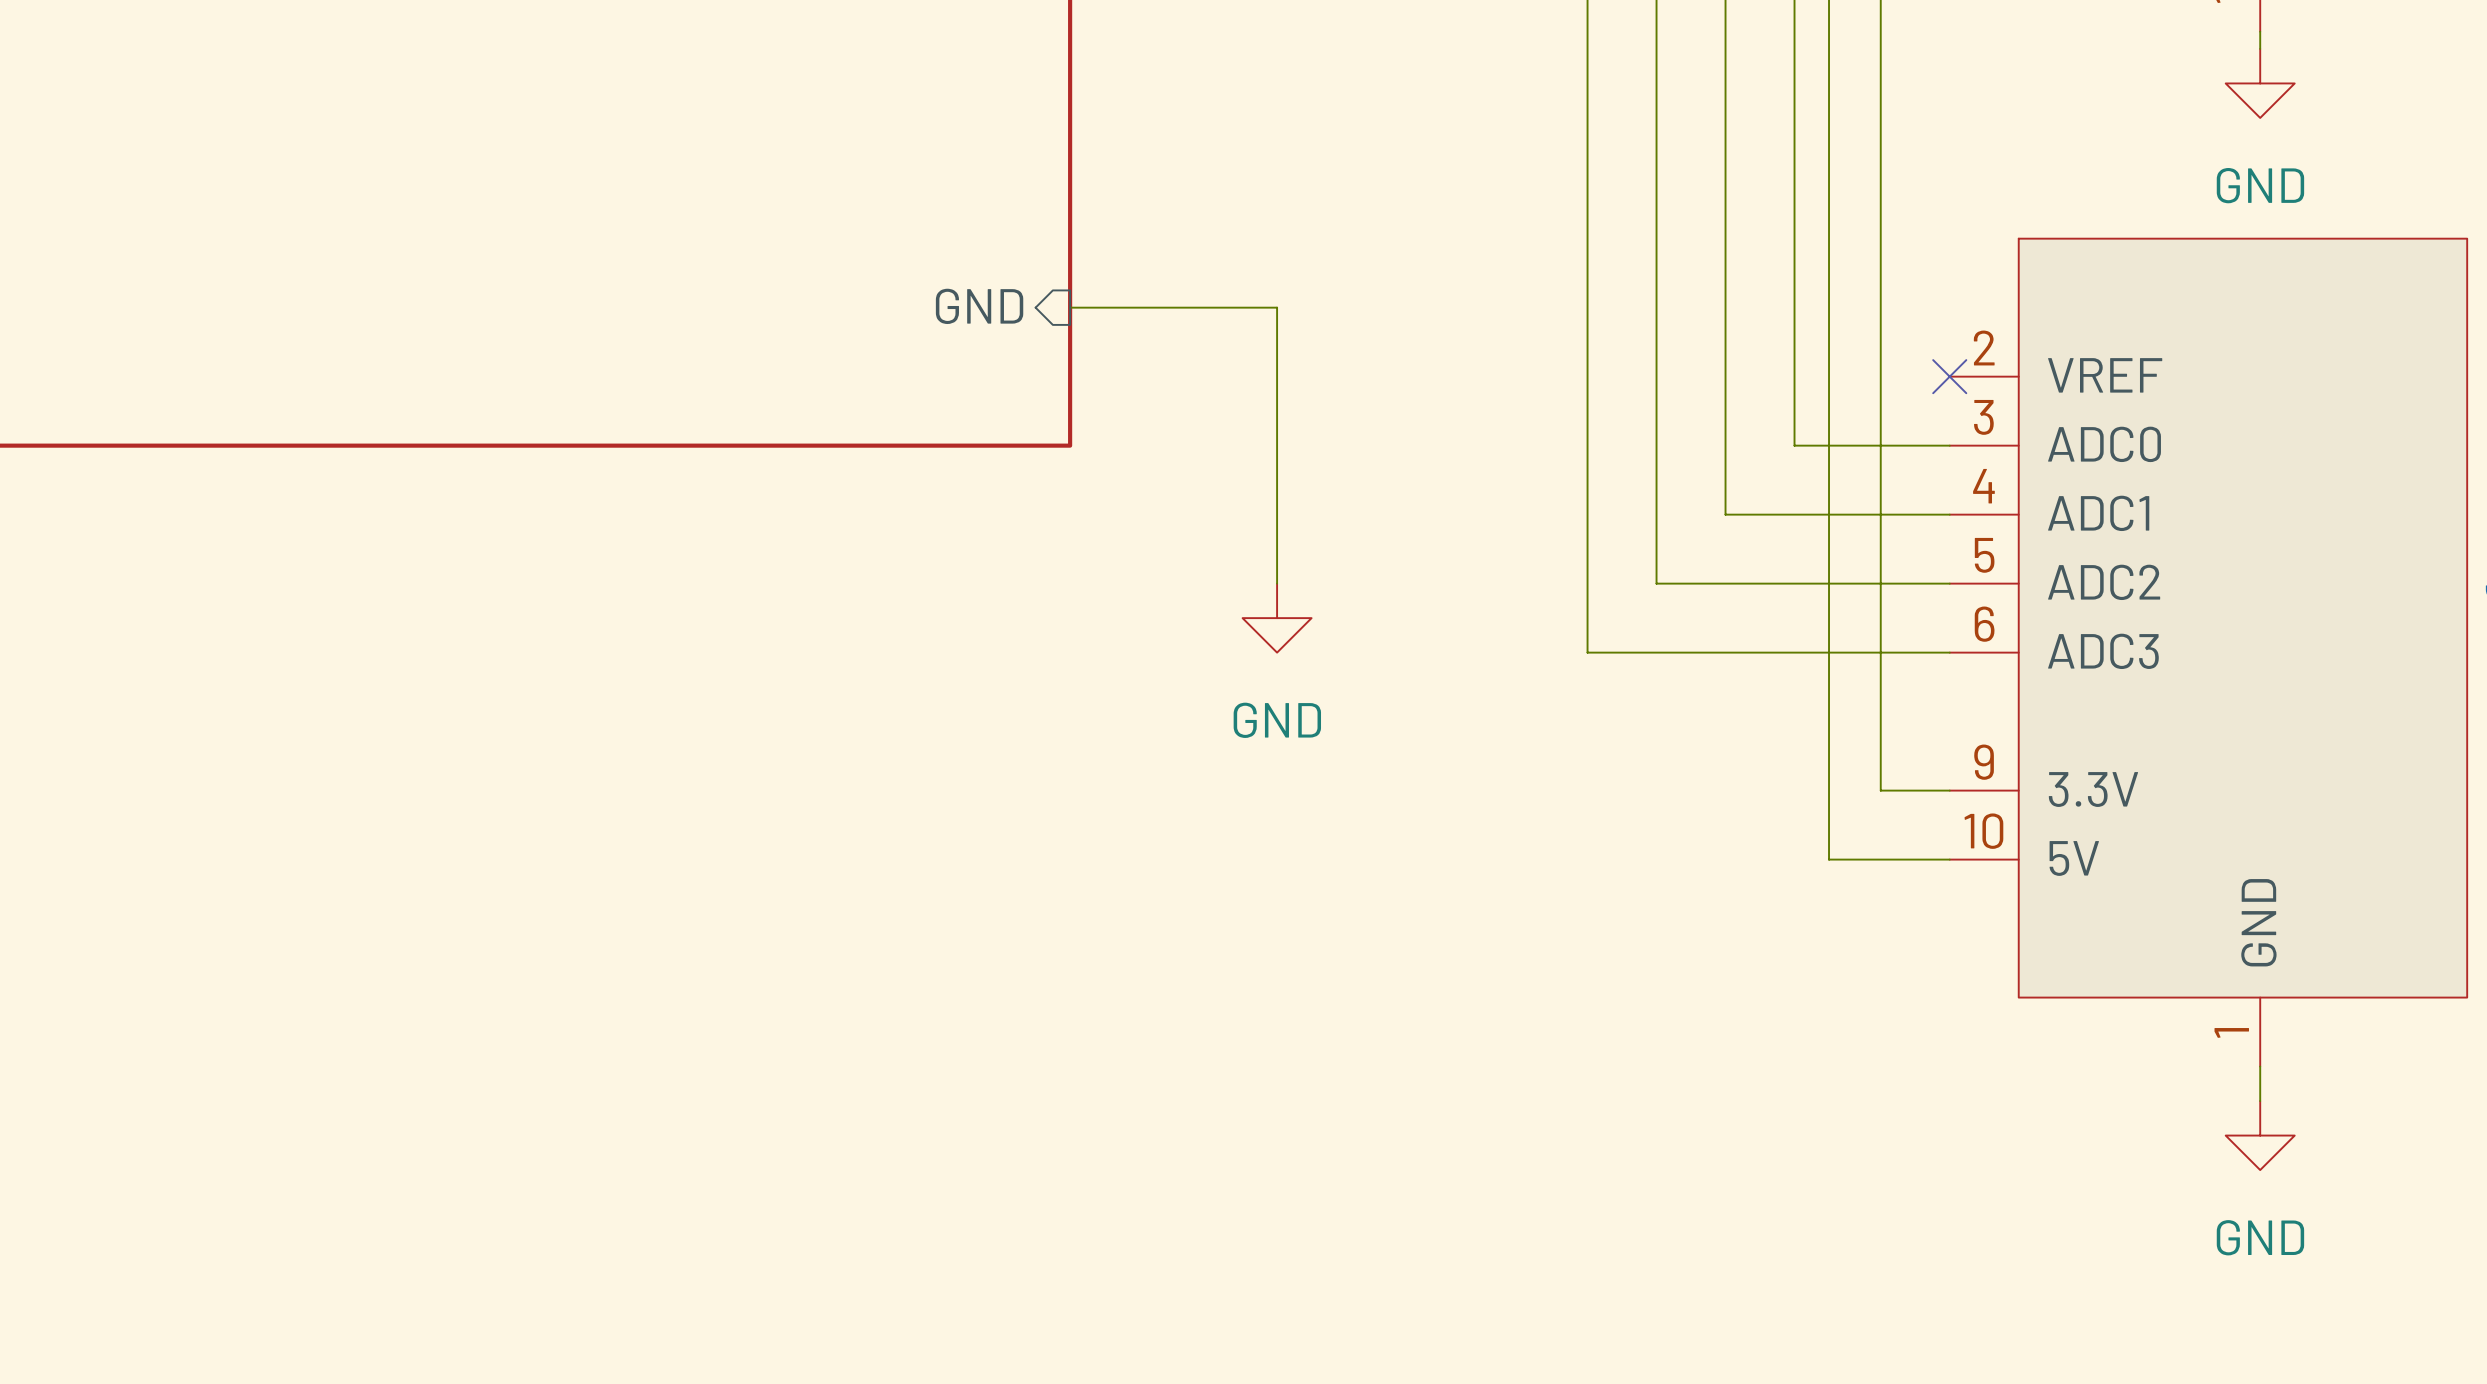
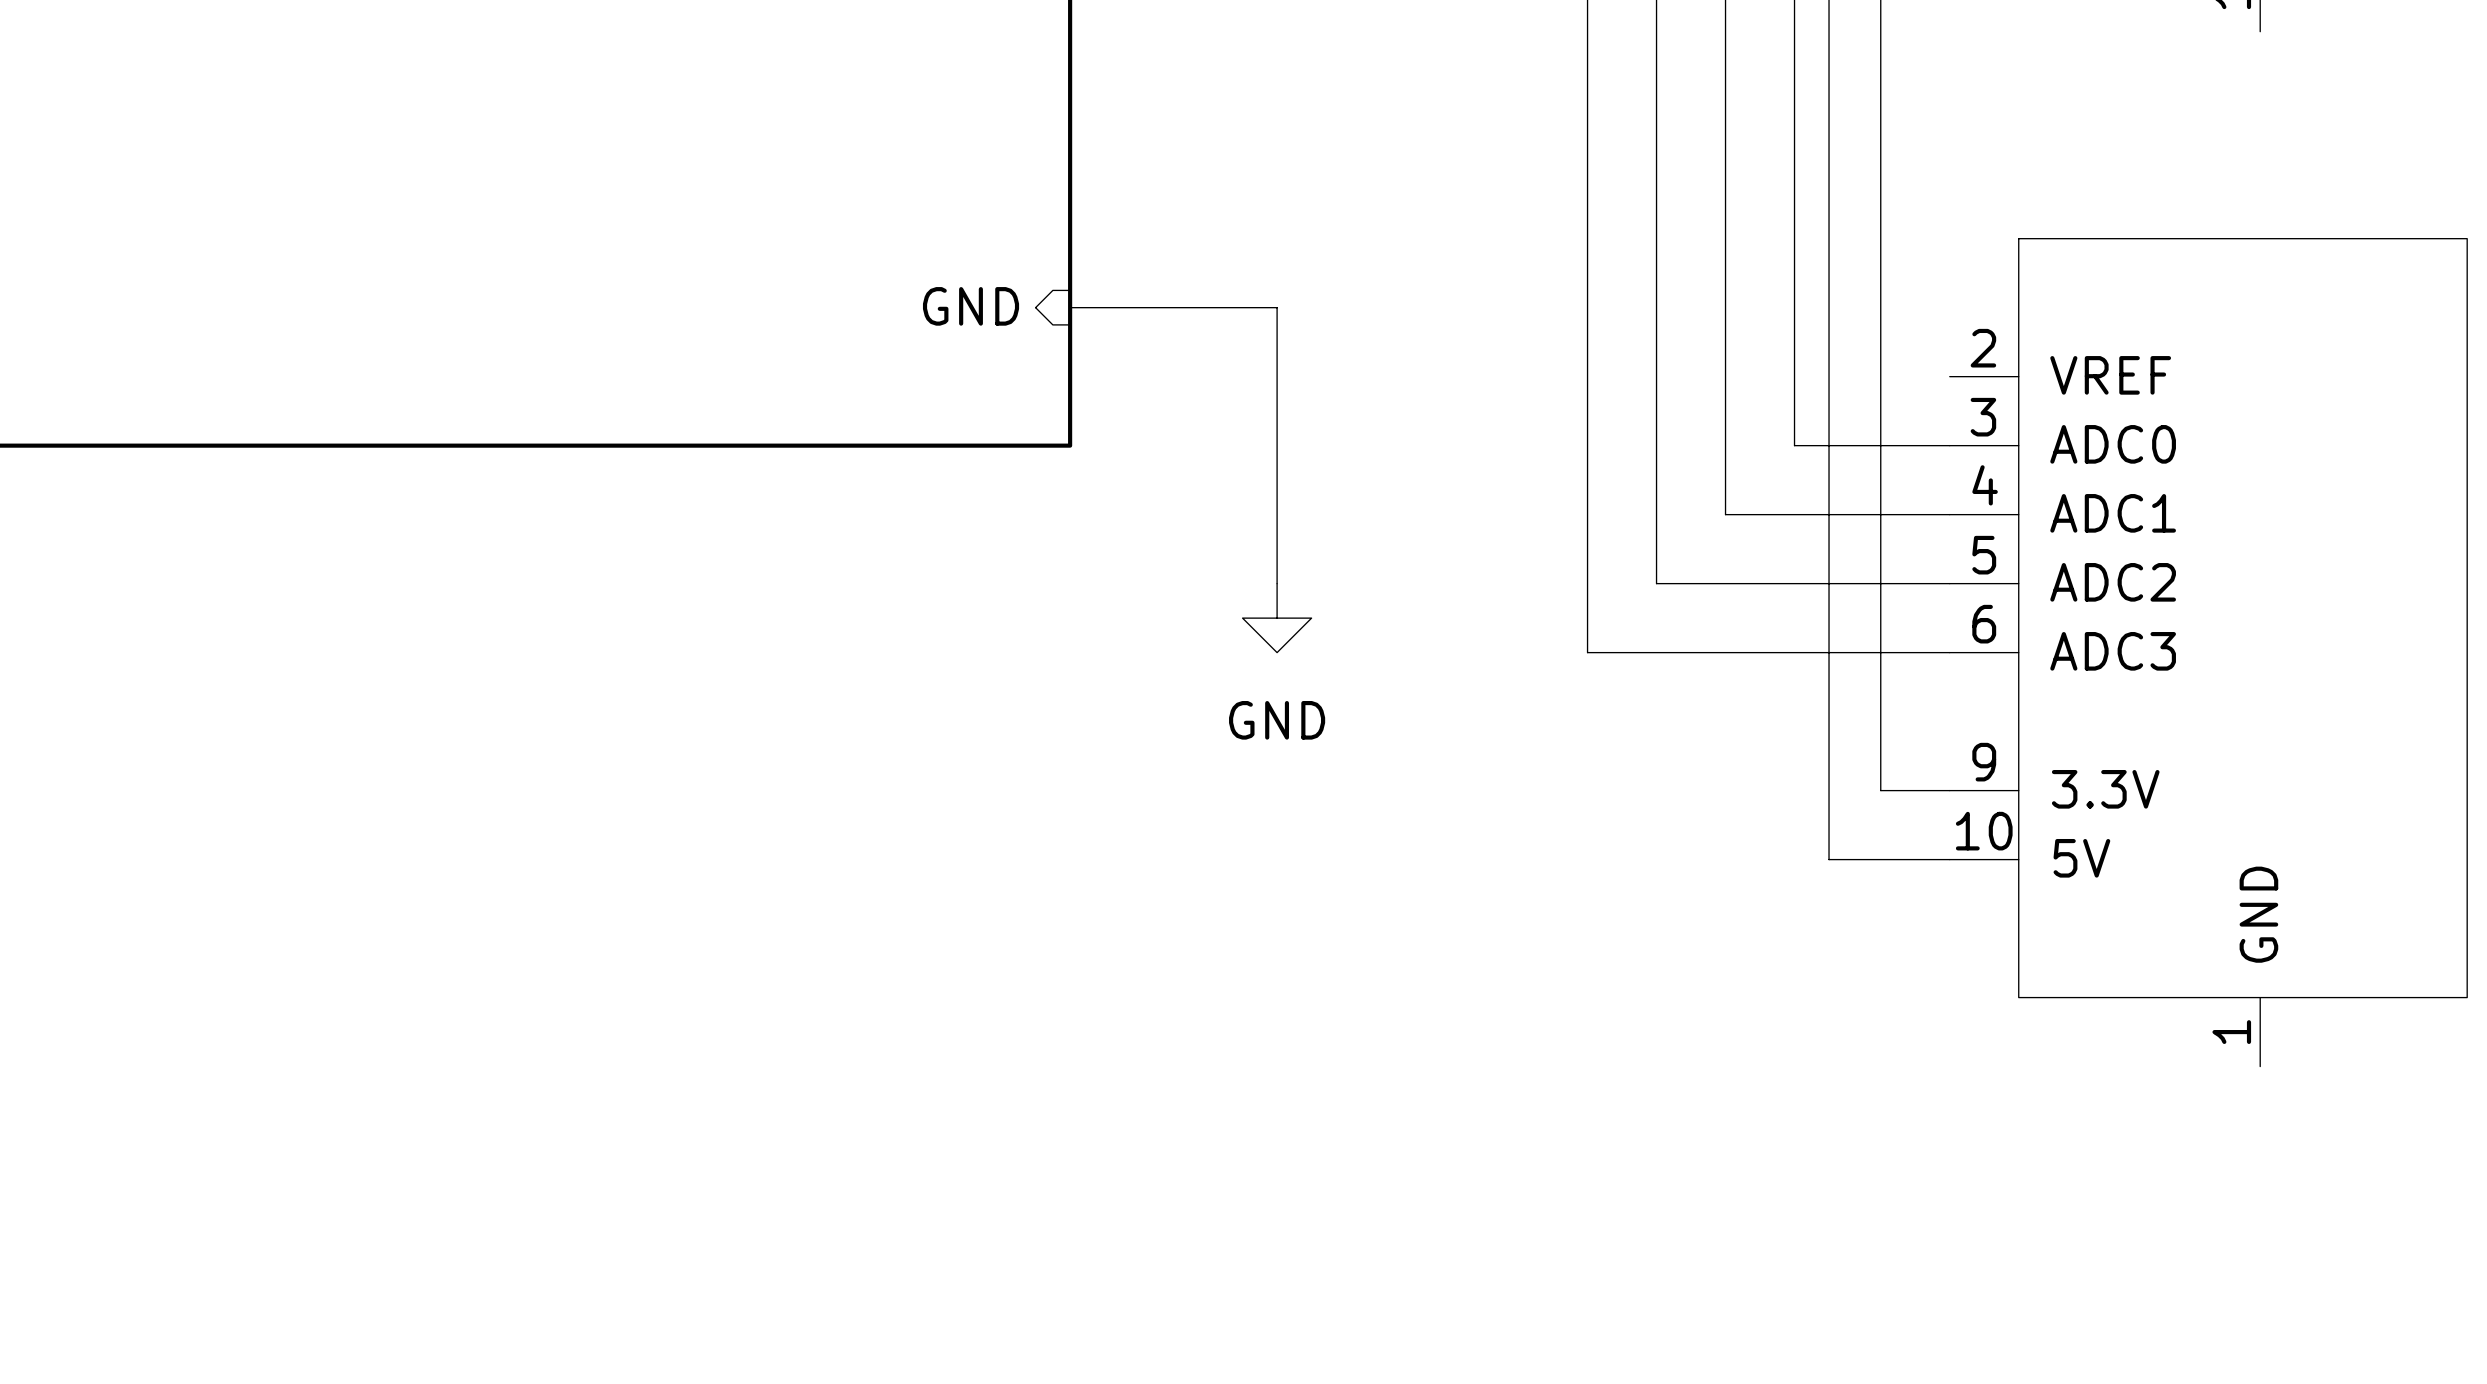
wire: (2260, 31) (2260, 48) -> none
power symbol: GND (2260, 83) -> none
no-connect mark: (1949, 376) -> none
wire: (2260, 1066) (2260, 1101) -> none
power symbol: GND (2260, 1135) -> none

